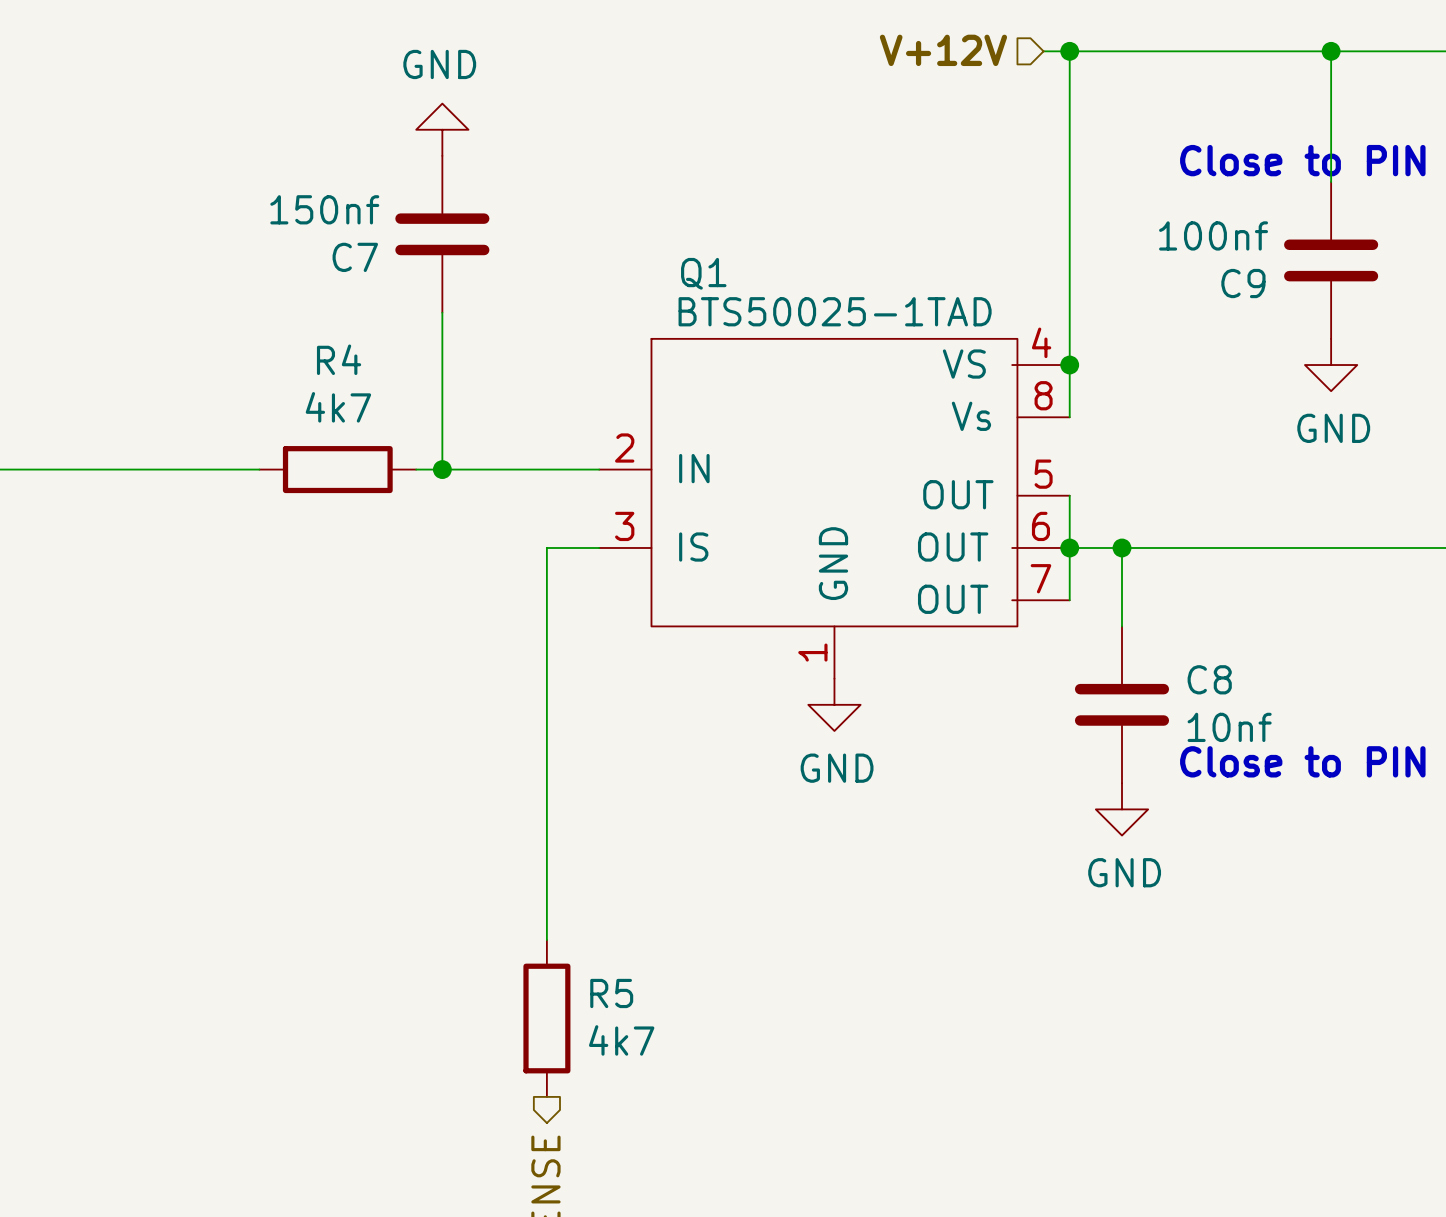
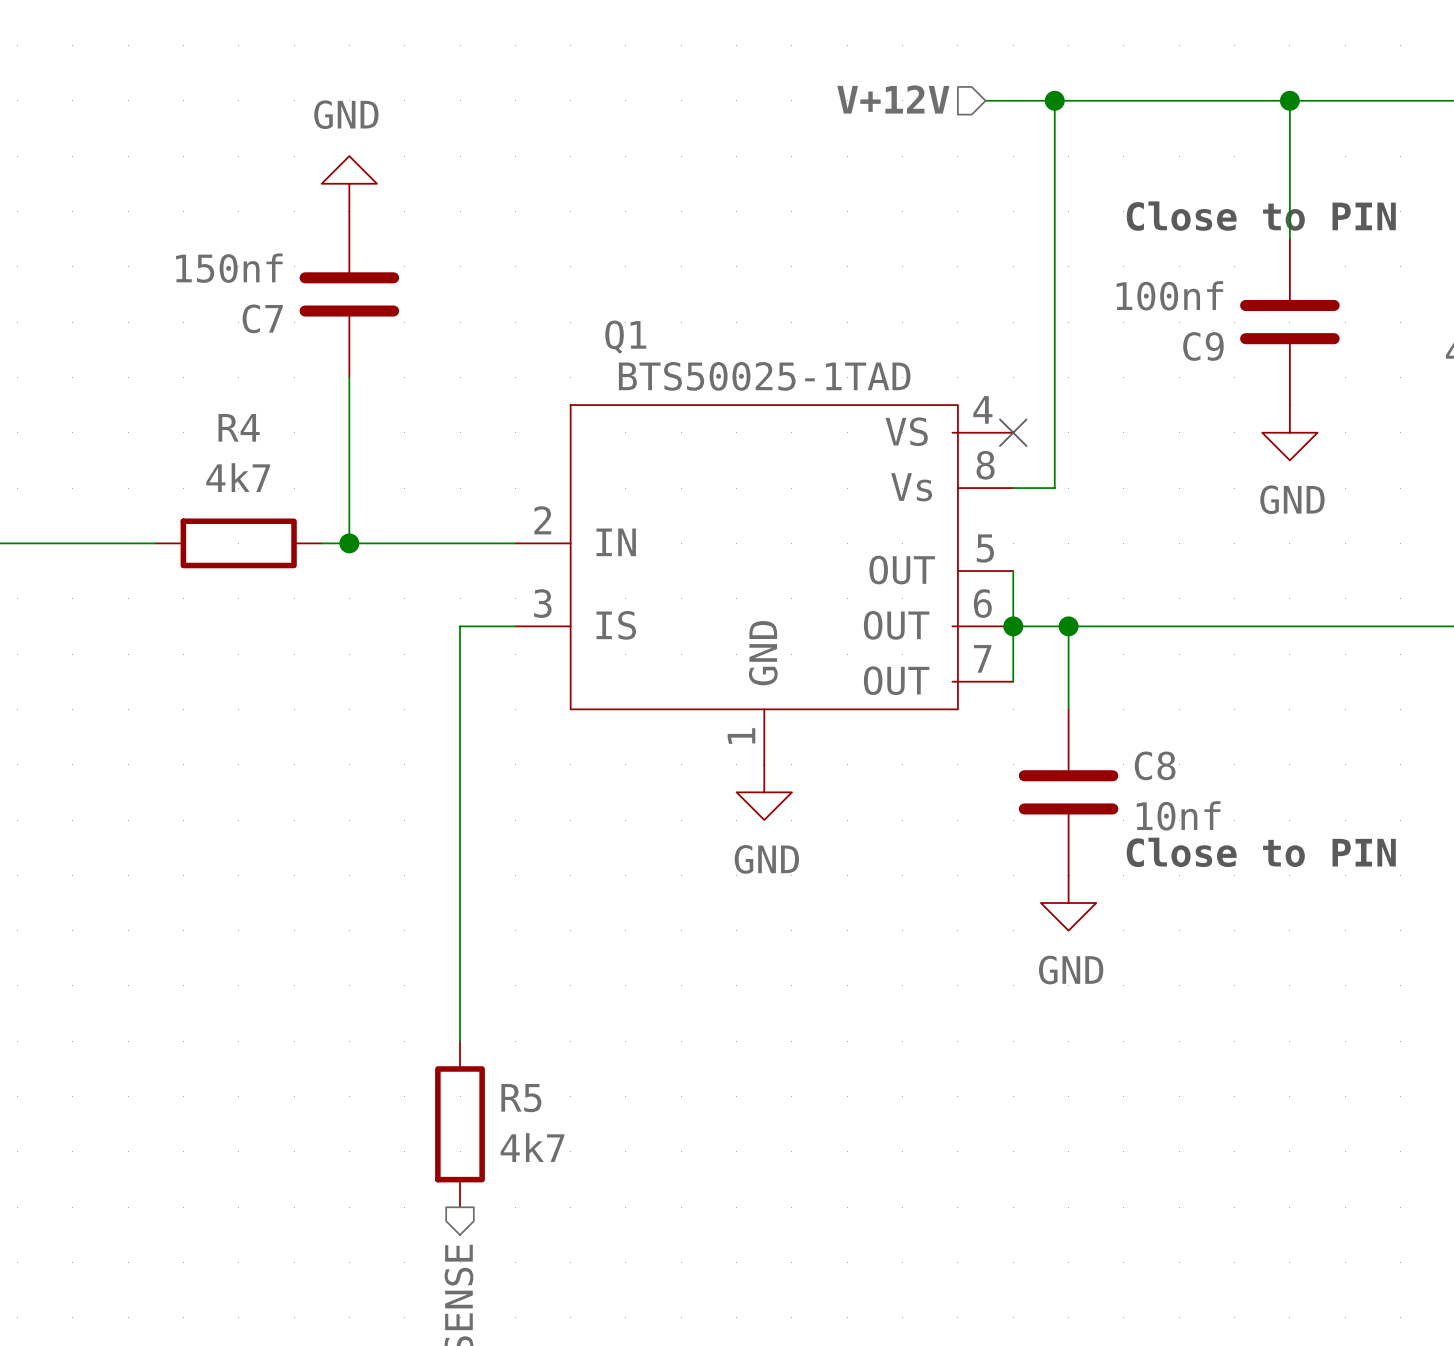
wire: (1069, 51) (1069, 417) -> (1054, 100) (1054, 488) (1013, 488)
junction position: (1069, 51) -> (1054, 100)
junction: (1069, 365) -> none
no-connect mark: none -> (1013, 432)

